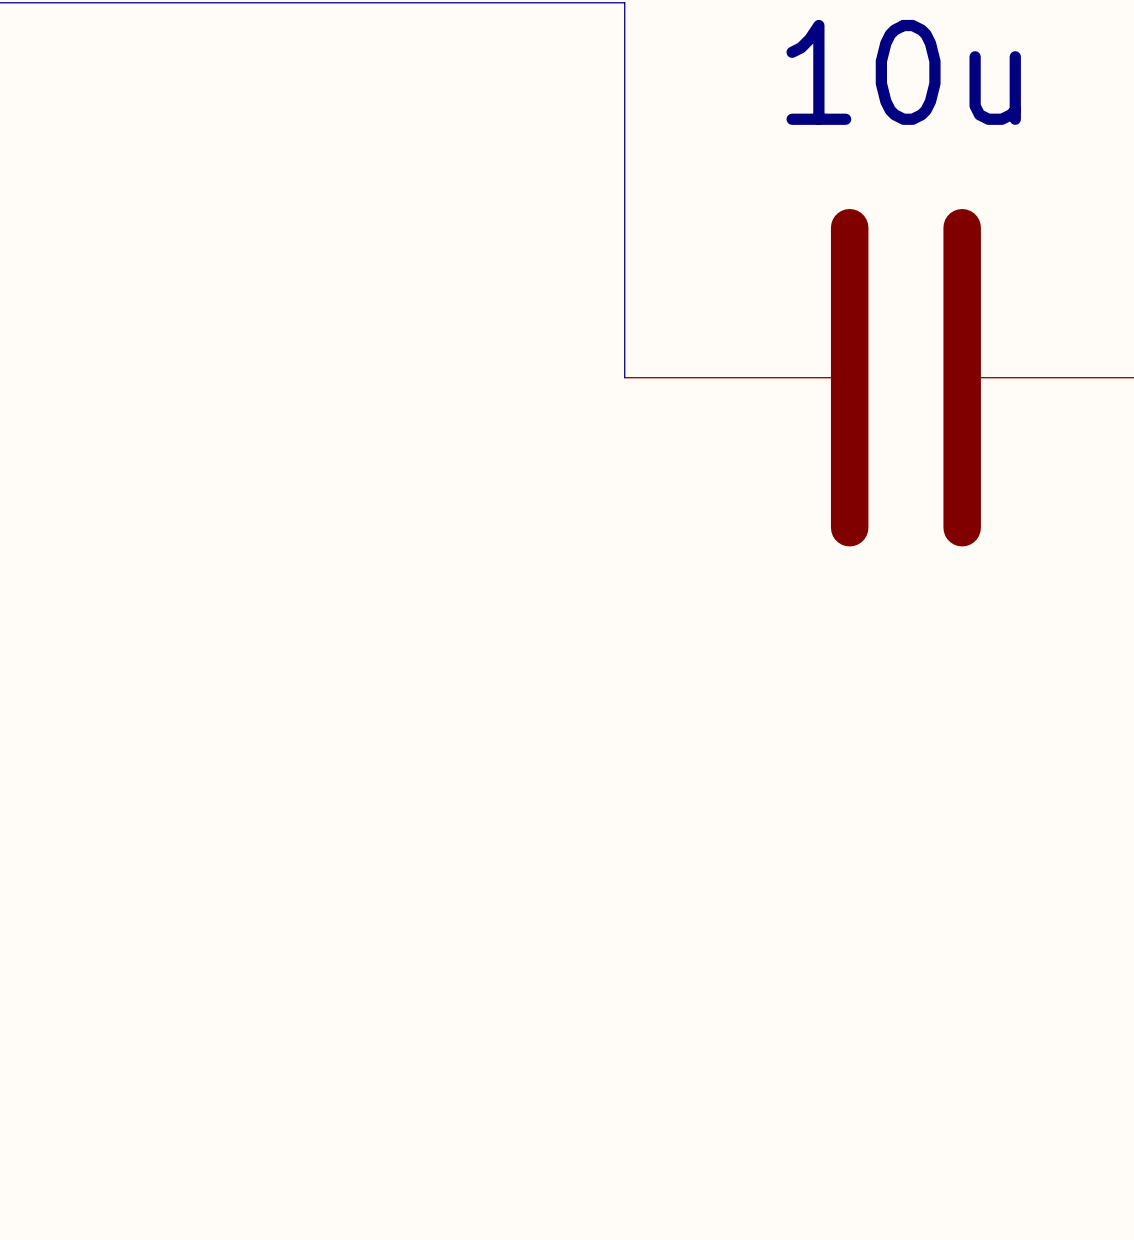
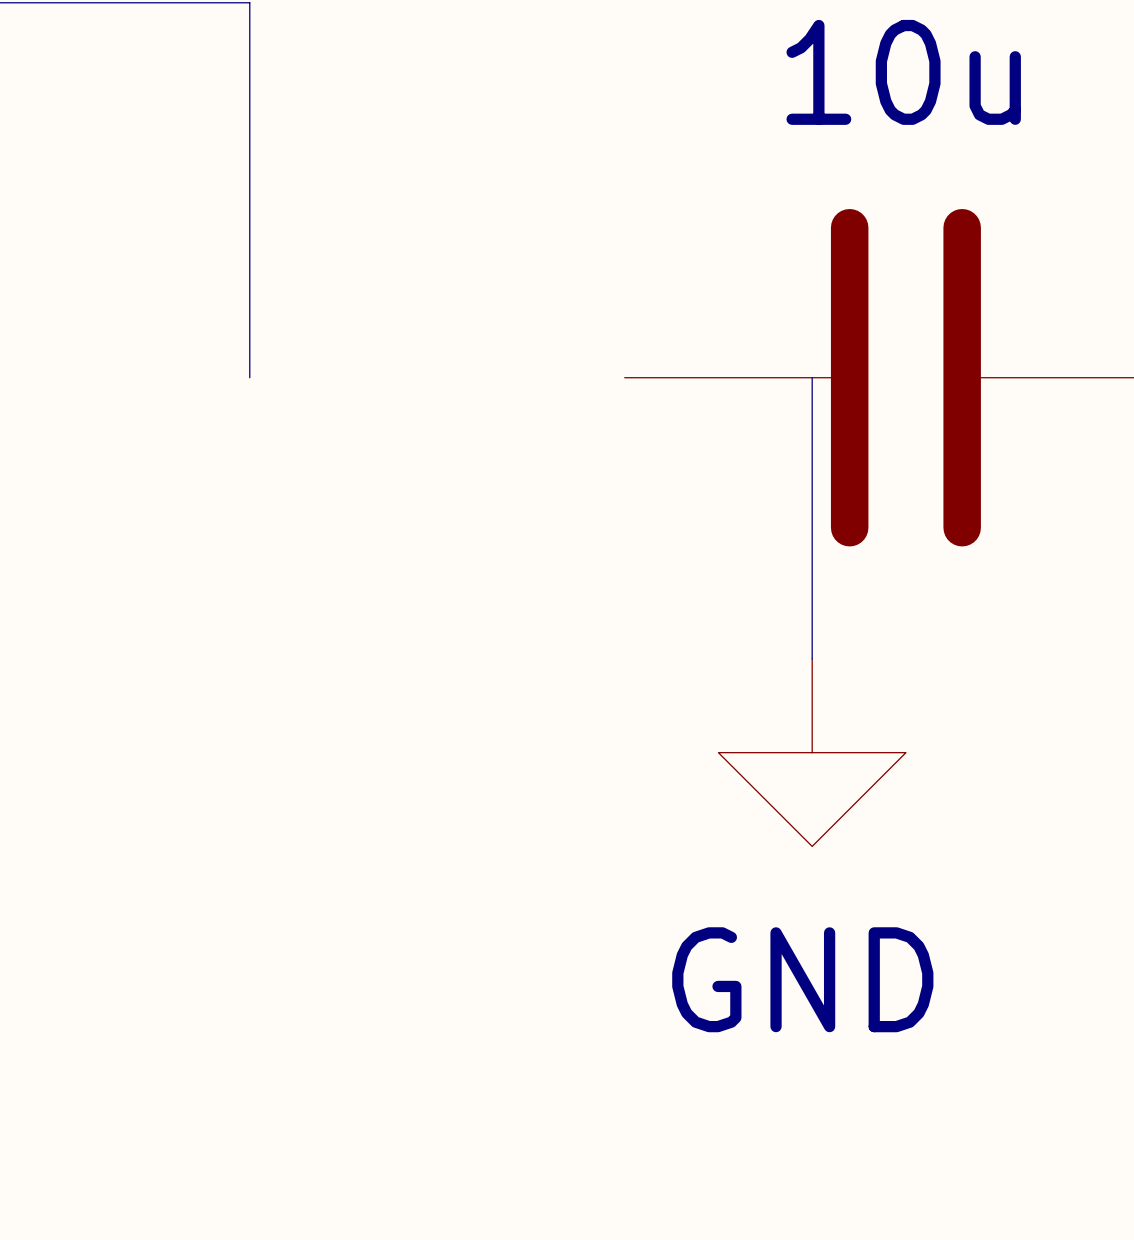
wire: (249, 2) (624, 2) (624, 377) -> (249, 2) (249, 377)
wire: none -> (812, 377) (812, 658)
power symbol: none -> GND (812, 752)

